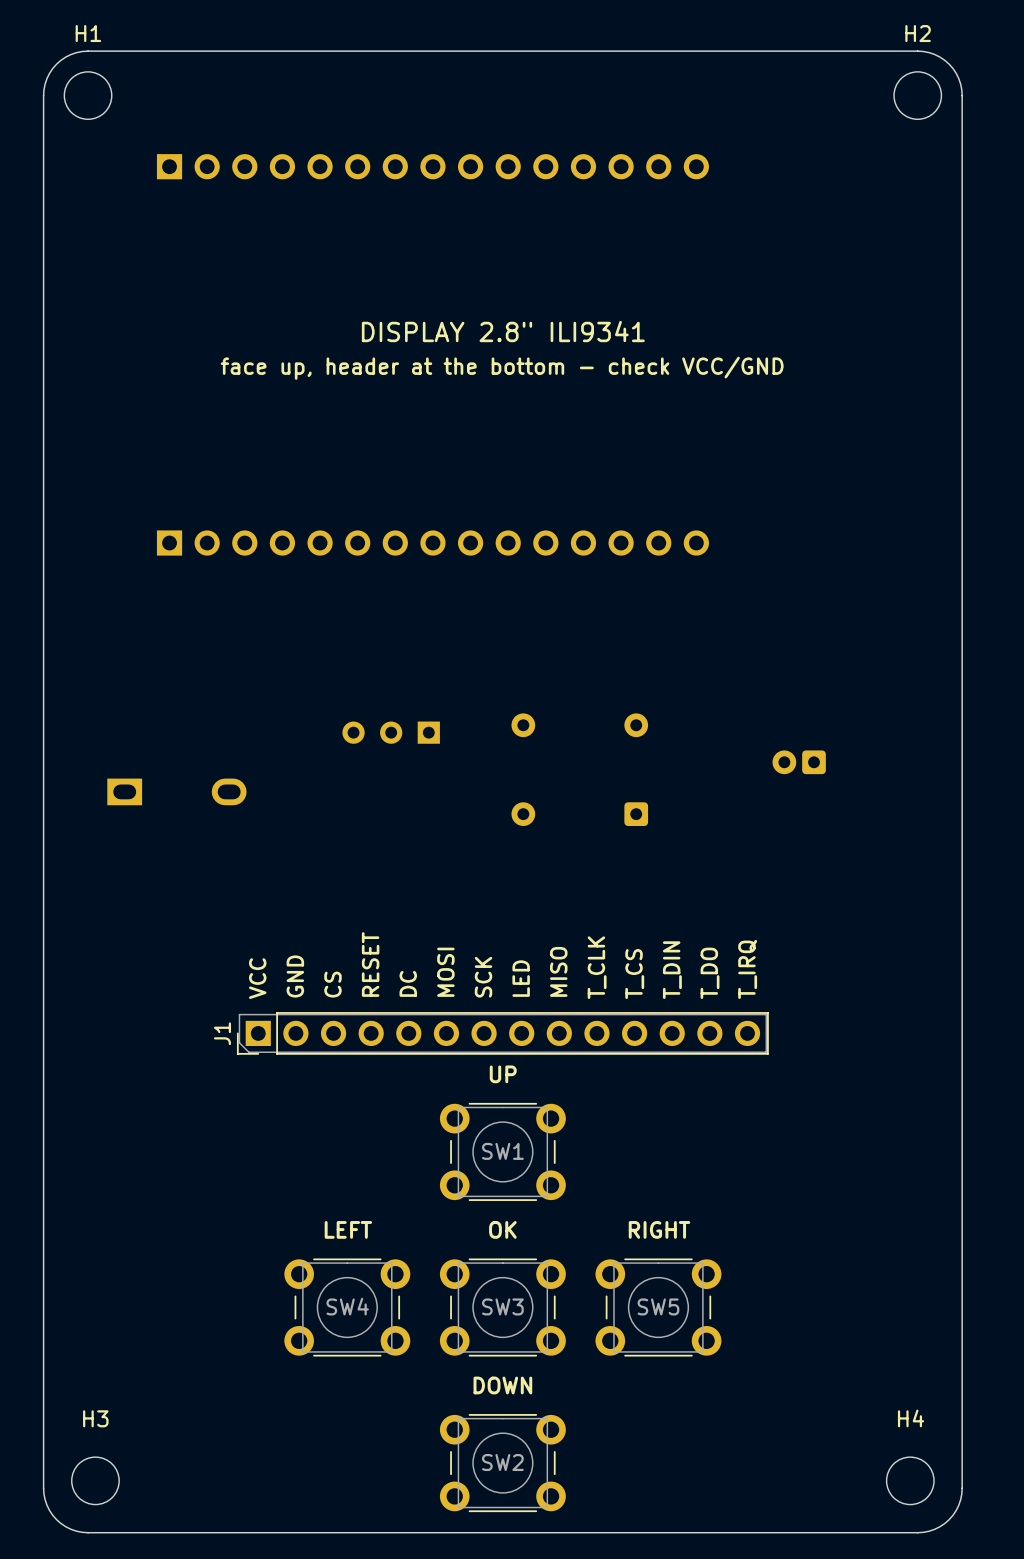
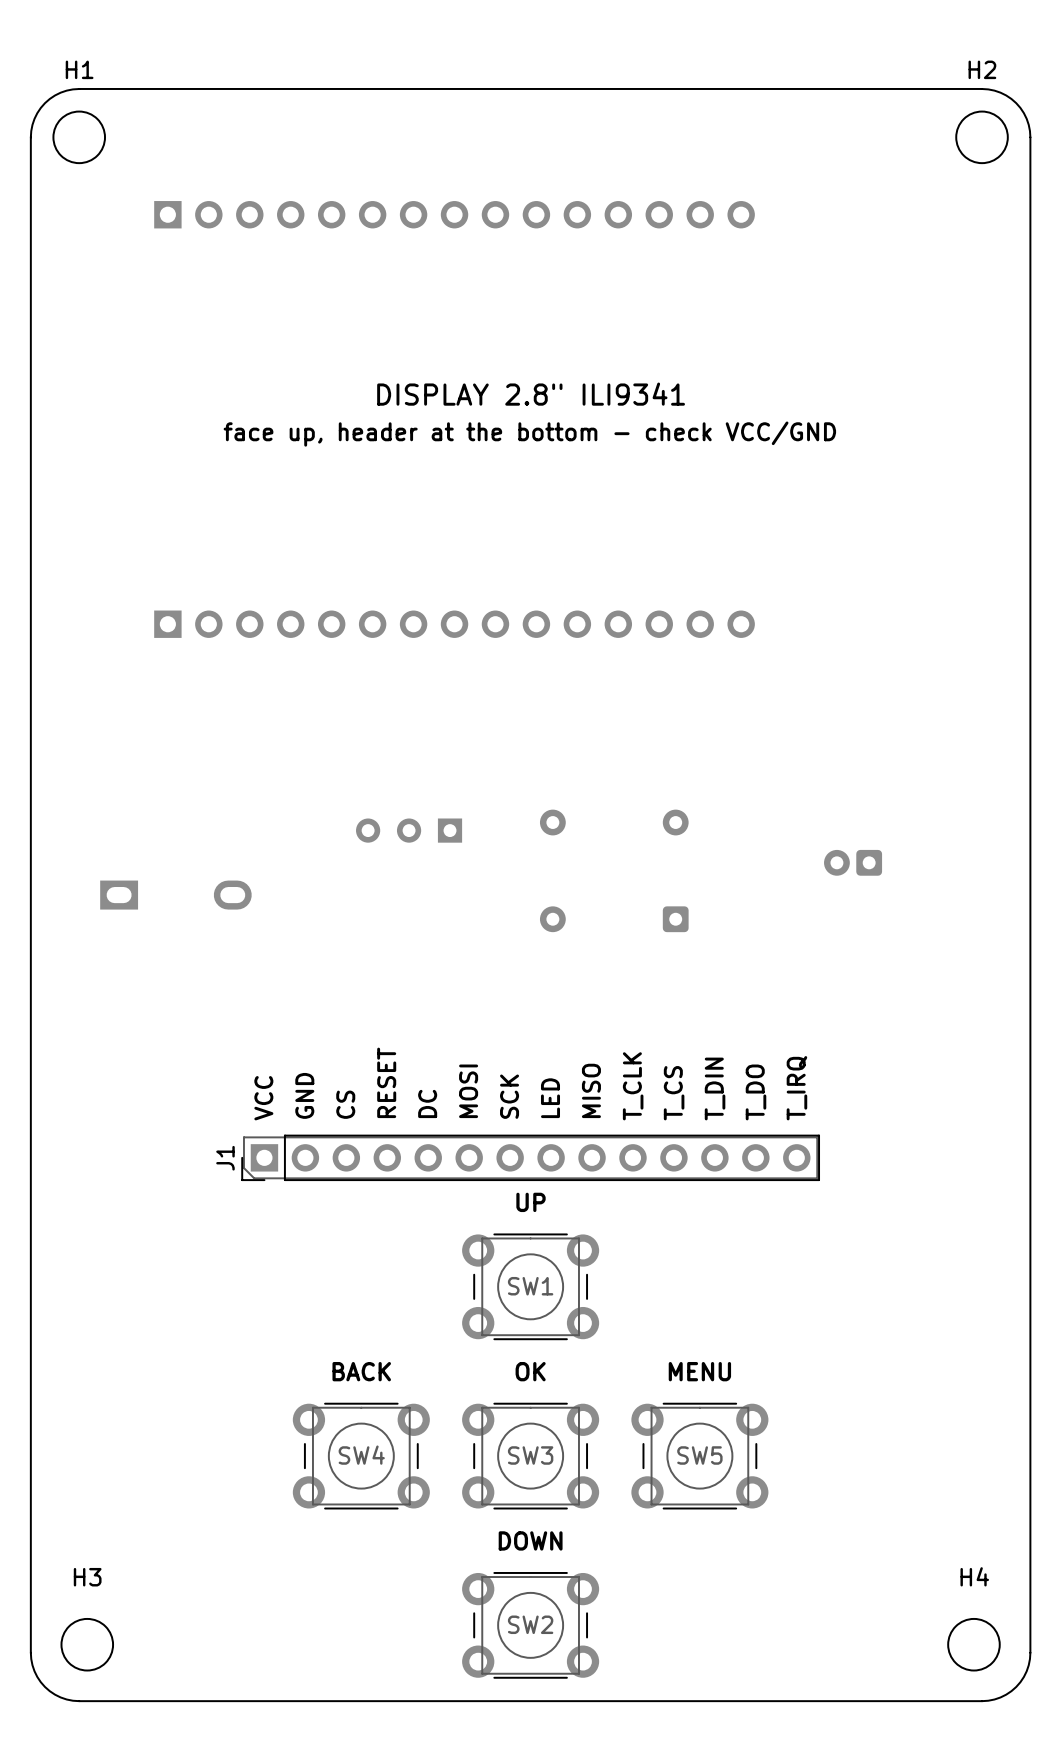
text: LEFT (348, 1229) -> BACK (361, 1371)
text: RIGHT (659, 1229) -> MENU (699, 1371)

